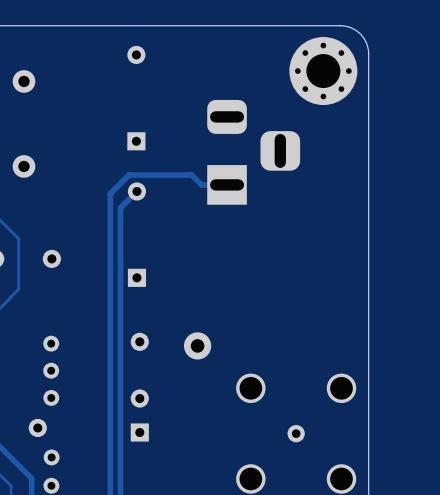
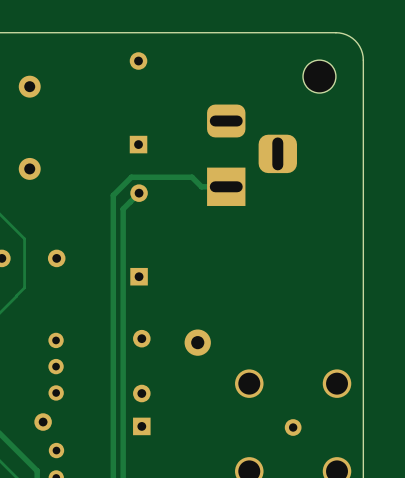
part footprint: [289, 37, 358, 106] -> [303, 60, 336, 94]

